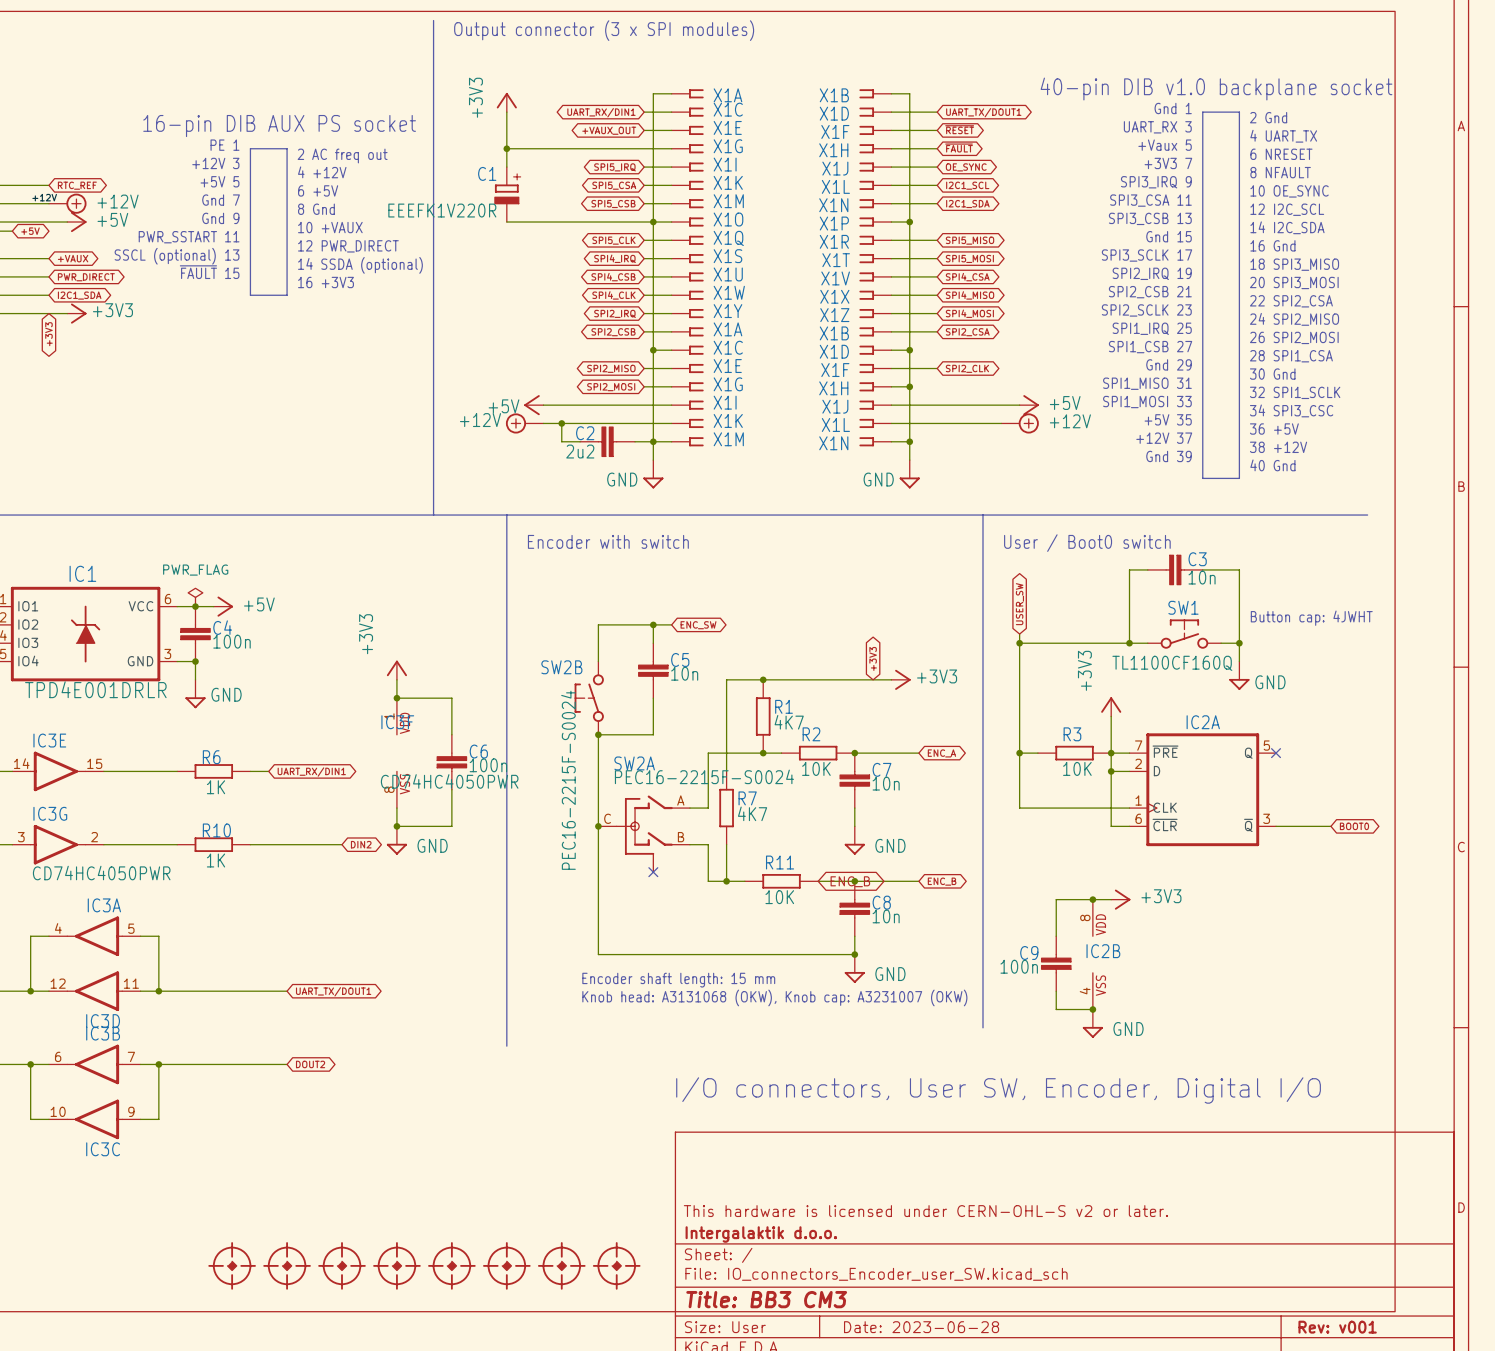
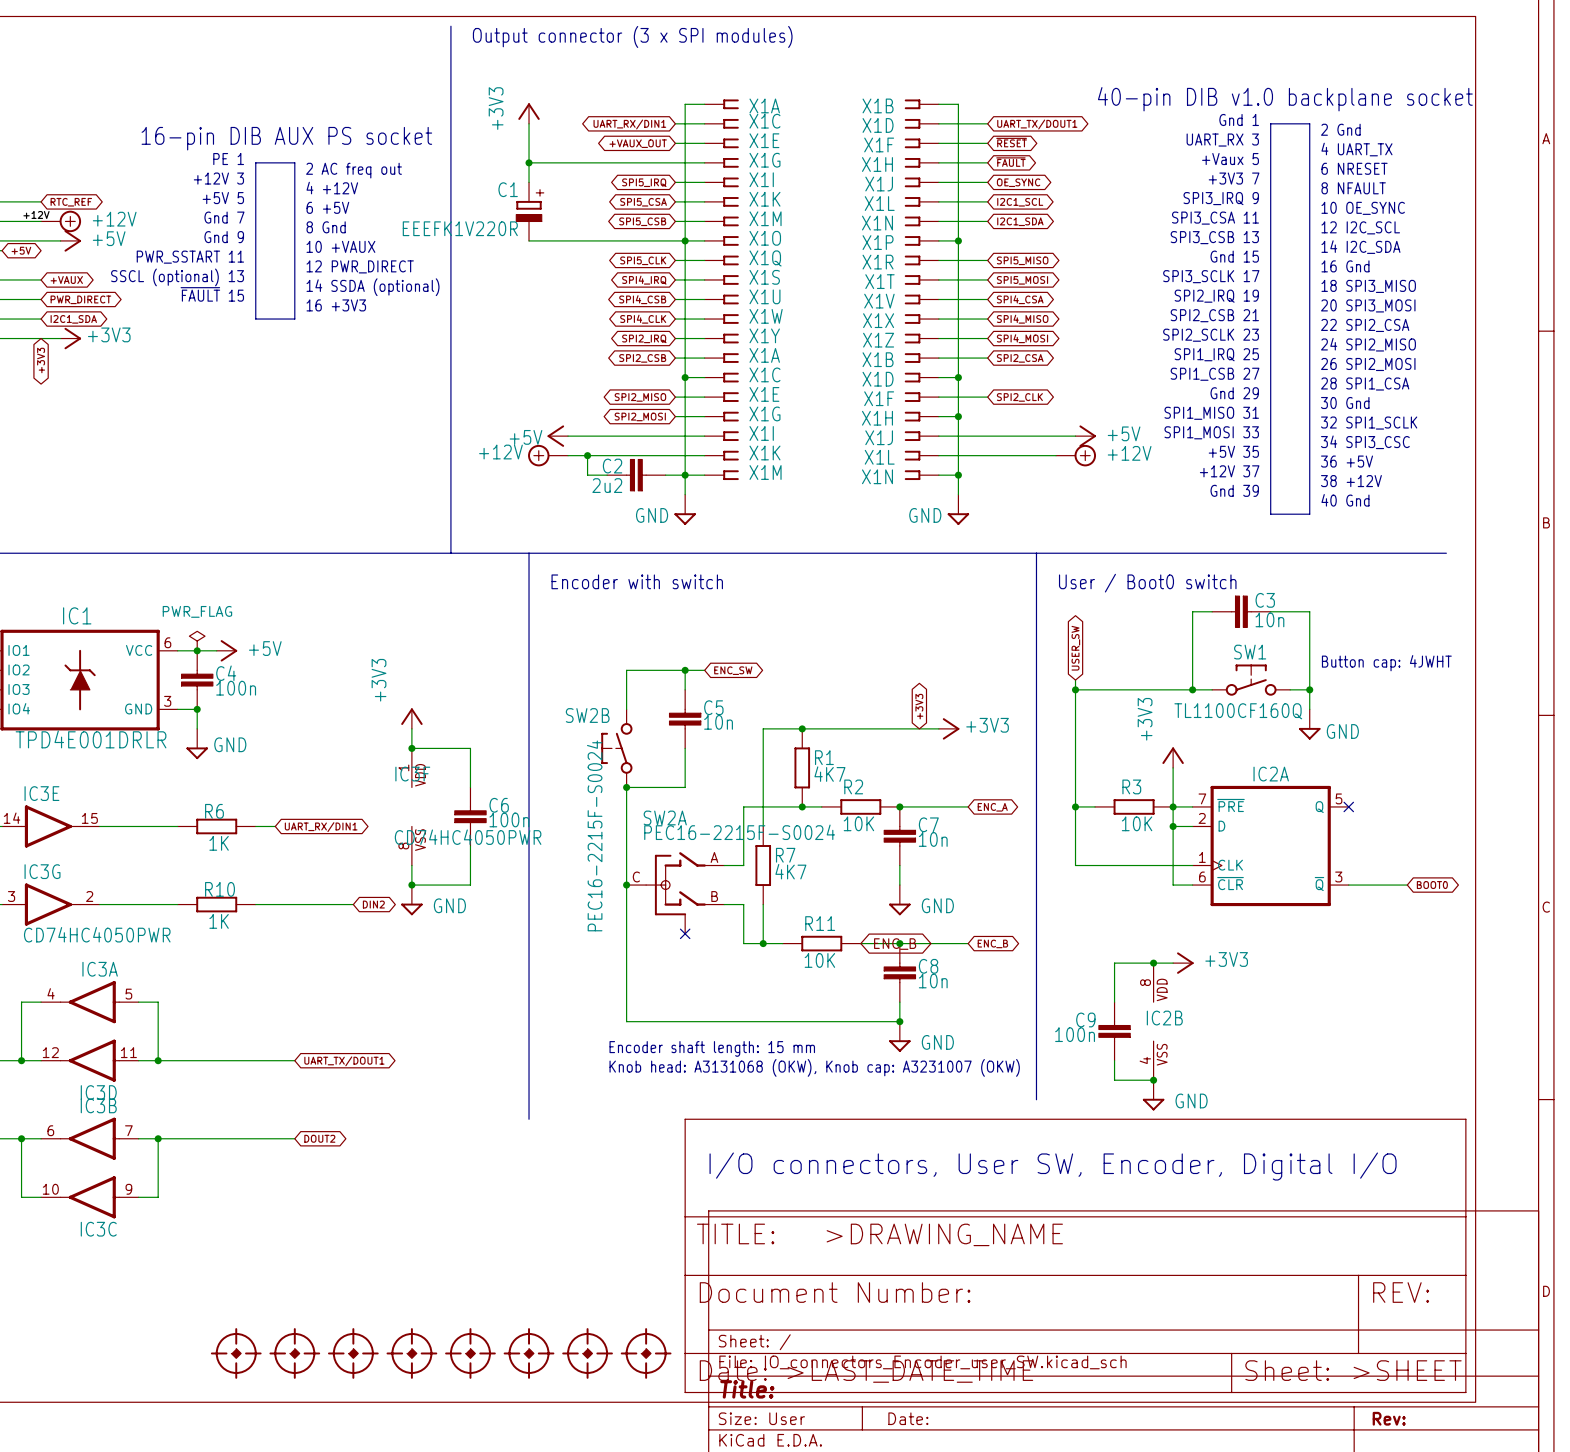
power symbol: none -> (1075, 1255)
title block: This hardware is licensed under CERN-OHL-S v2 or later. (925, 1211) -> none
title block: Intergalaktik d.o.o. (761, 1234) -> none
title block: Title: BB3 CM3 (766, 1299) -> Title: (747, 1389)
title block: Date: 2023-06-28 (921, 1327) -> Date: (908, 1418)
title block: Rev: v001 (1337, 1327) -> Rev: (1389, 1418)

